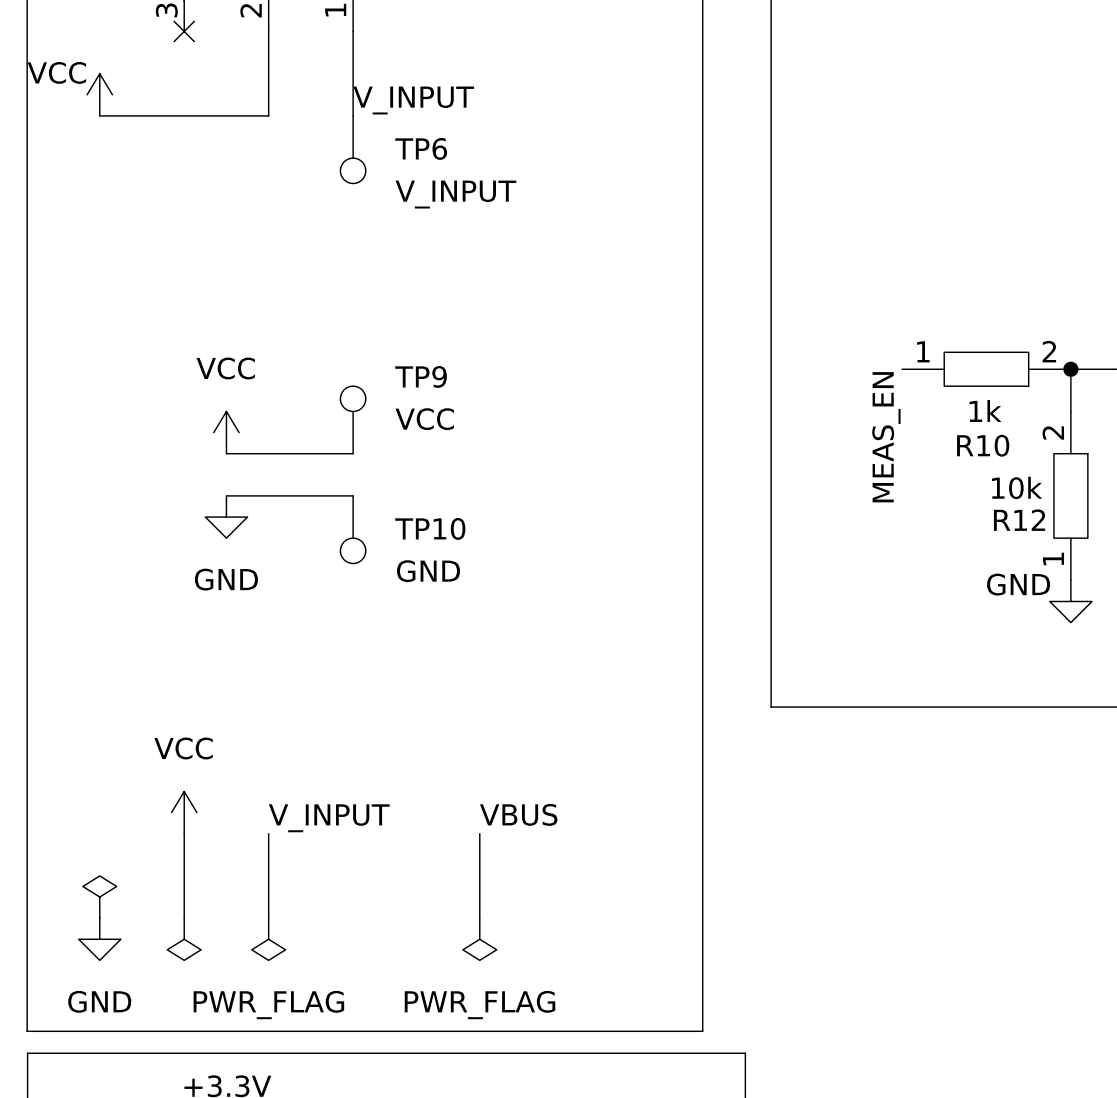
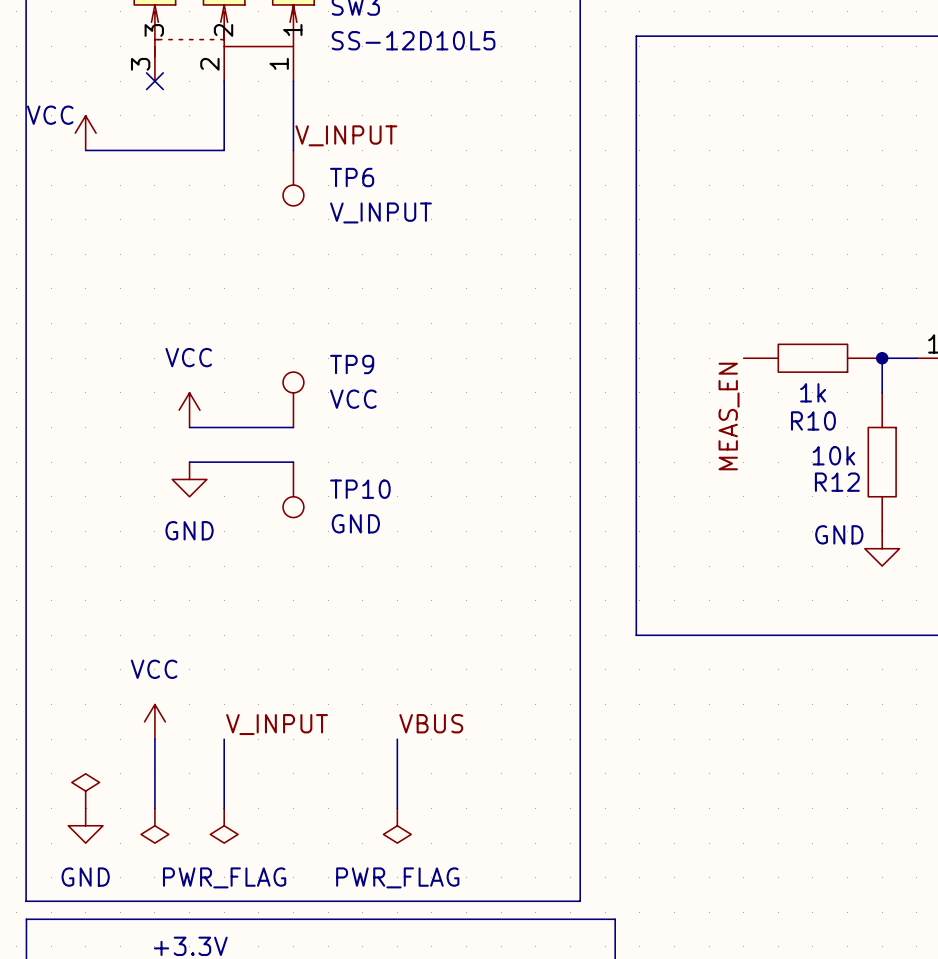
R10 pin number: 1 (923, 351) -> none
R10 pin number: 2 (1049, 351) -> none
R12 pin number: 2 (1053, 432) -> none
R12 pin number: 1 (1053, 559) -> none

